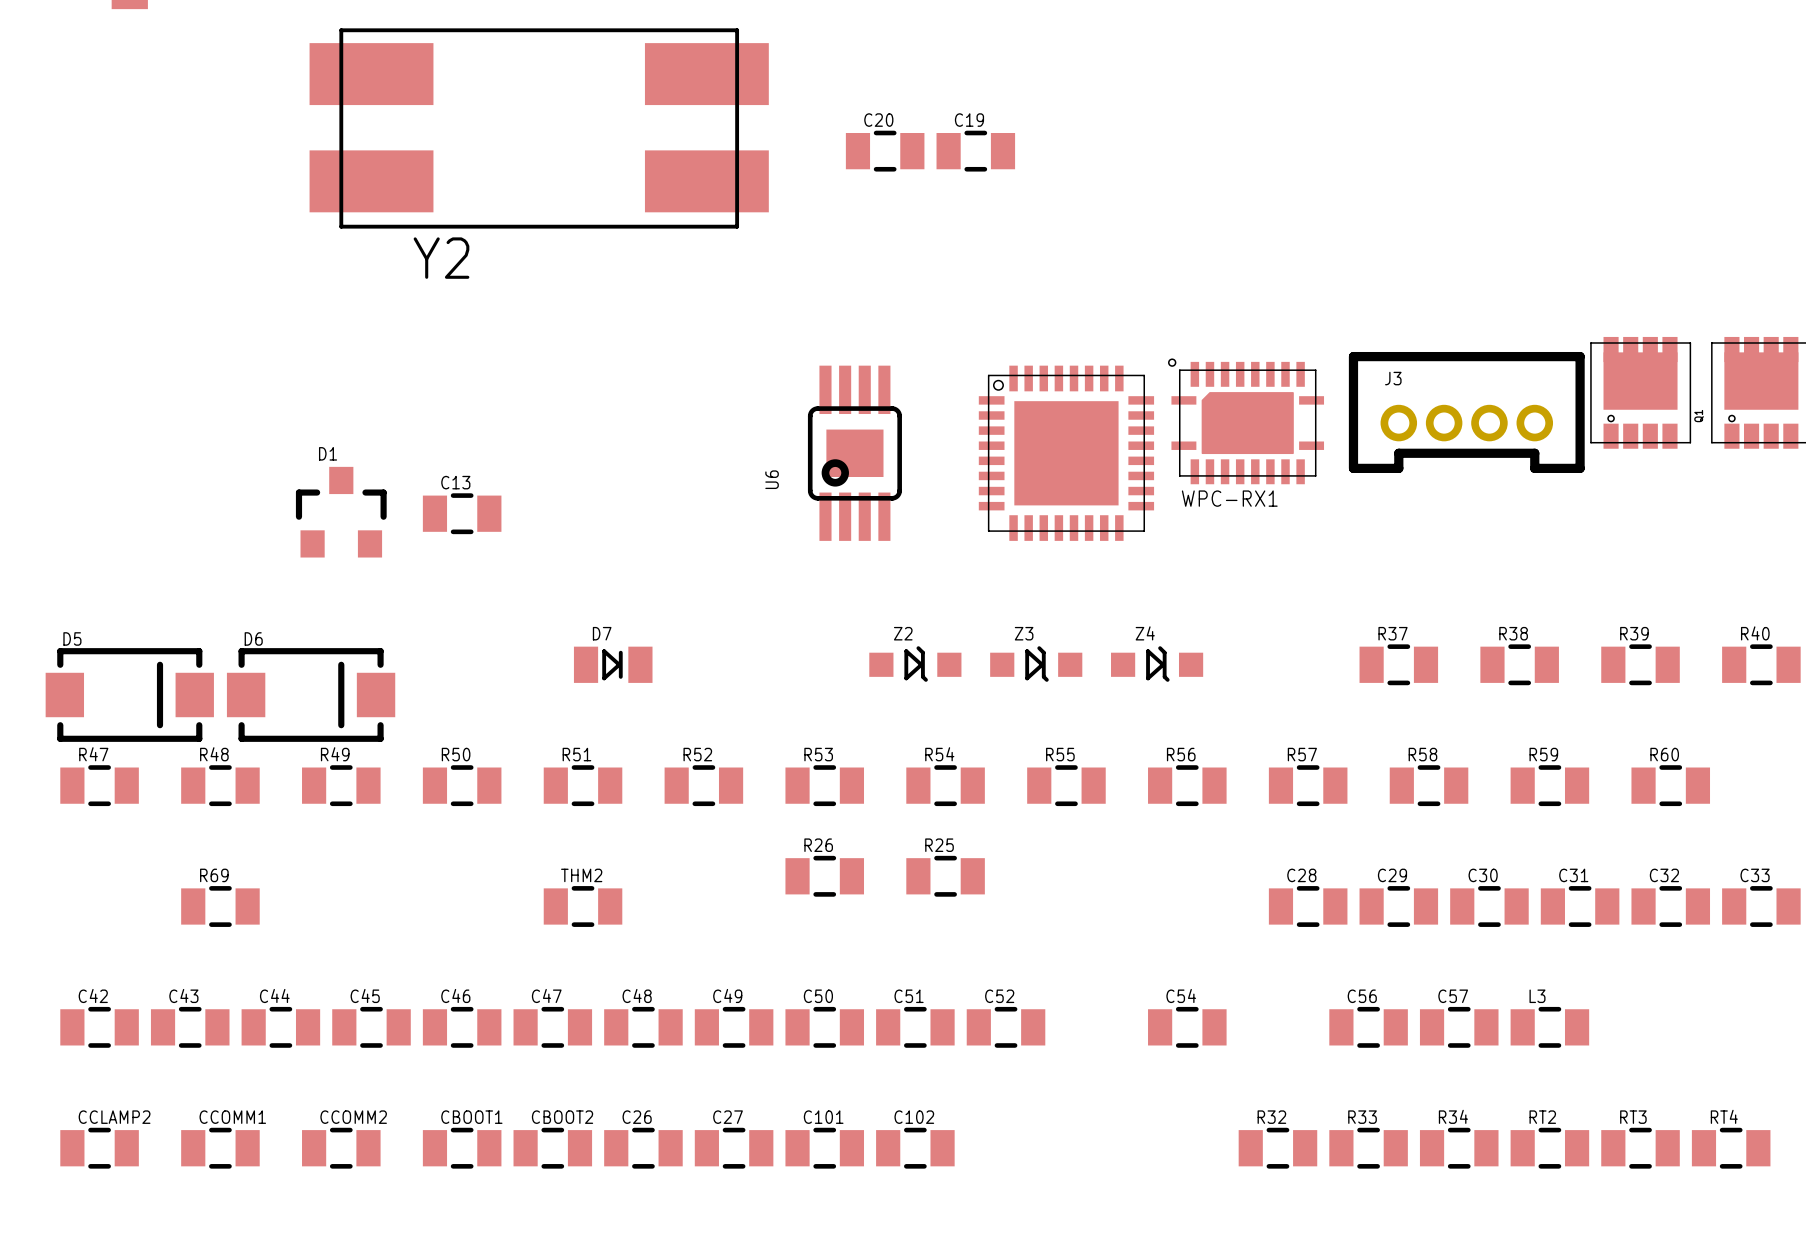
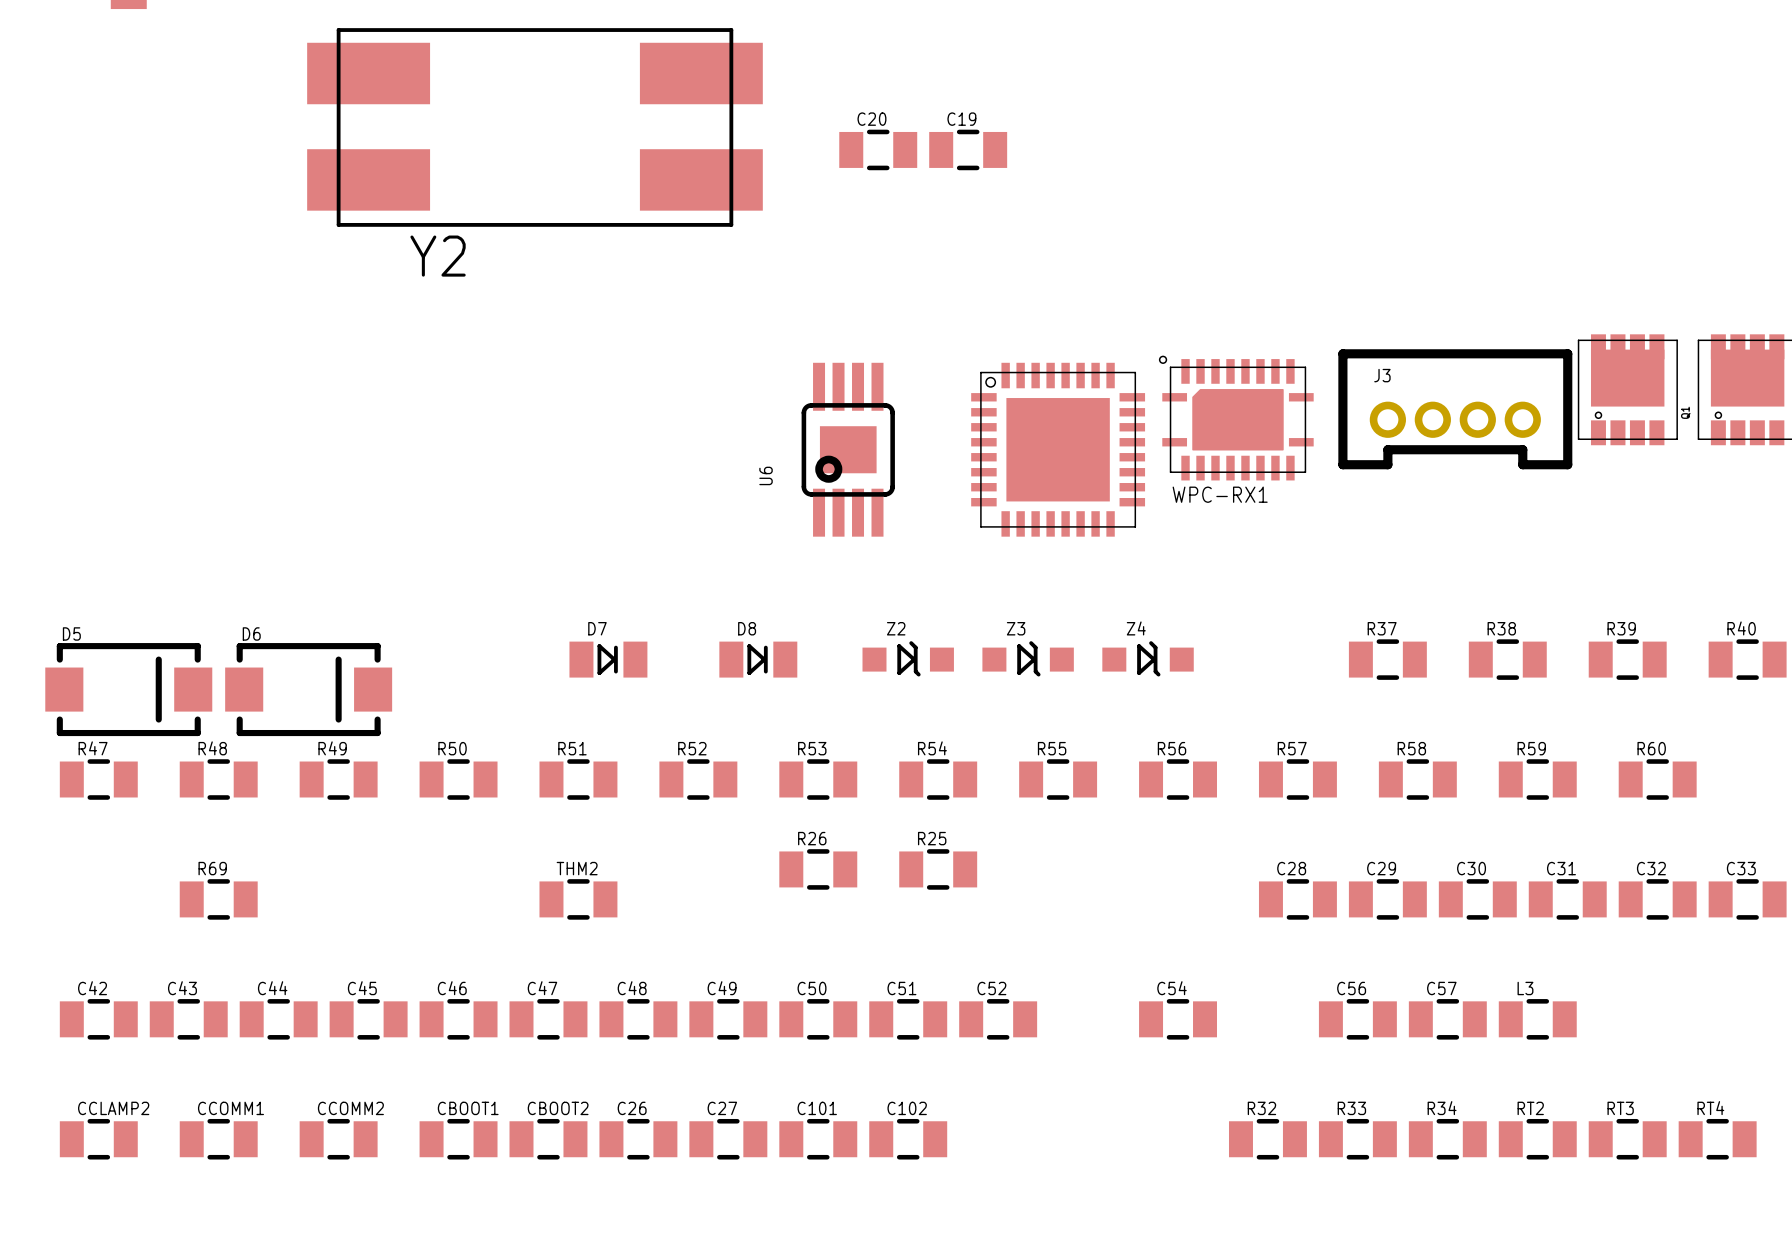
D1: (341, 512) -> none
C13: (462, 513) -> none
D8: none -> (758, 659)

